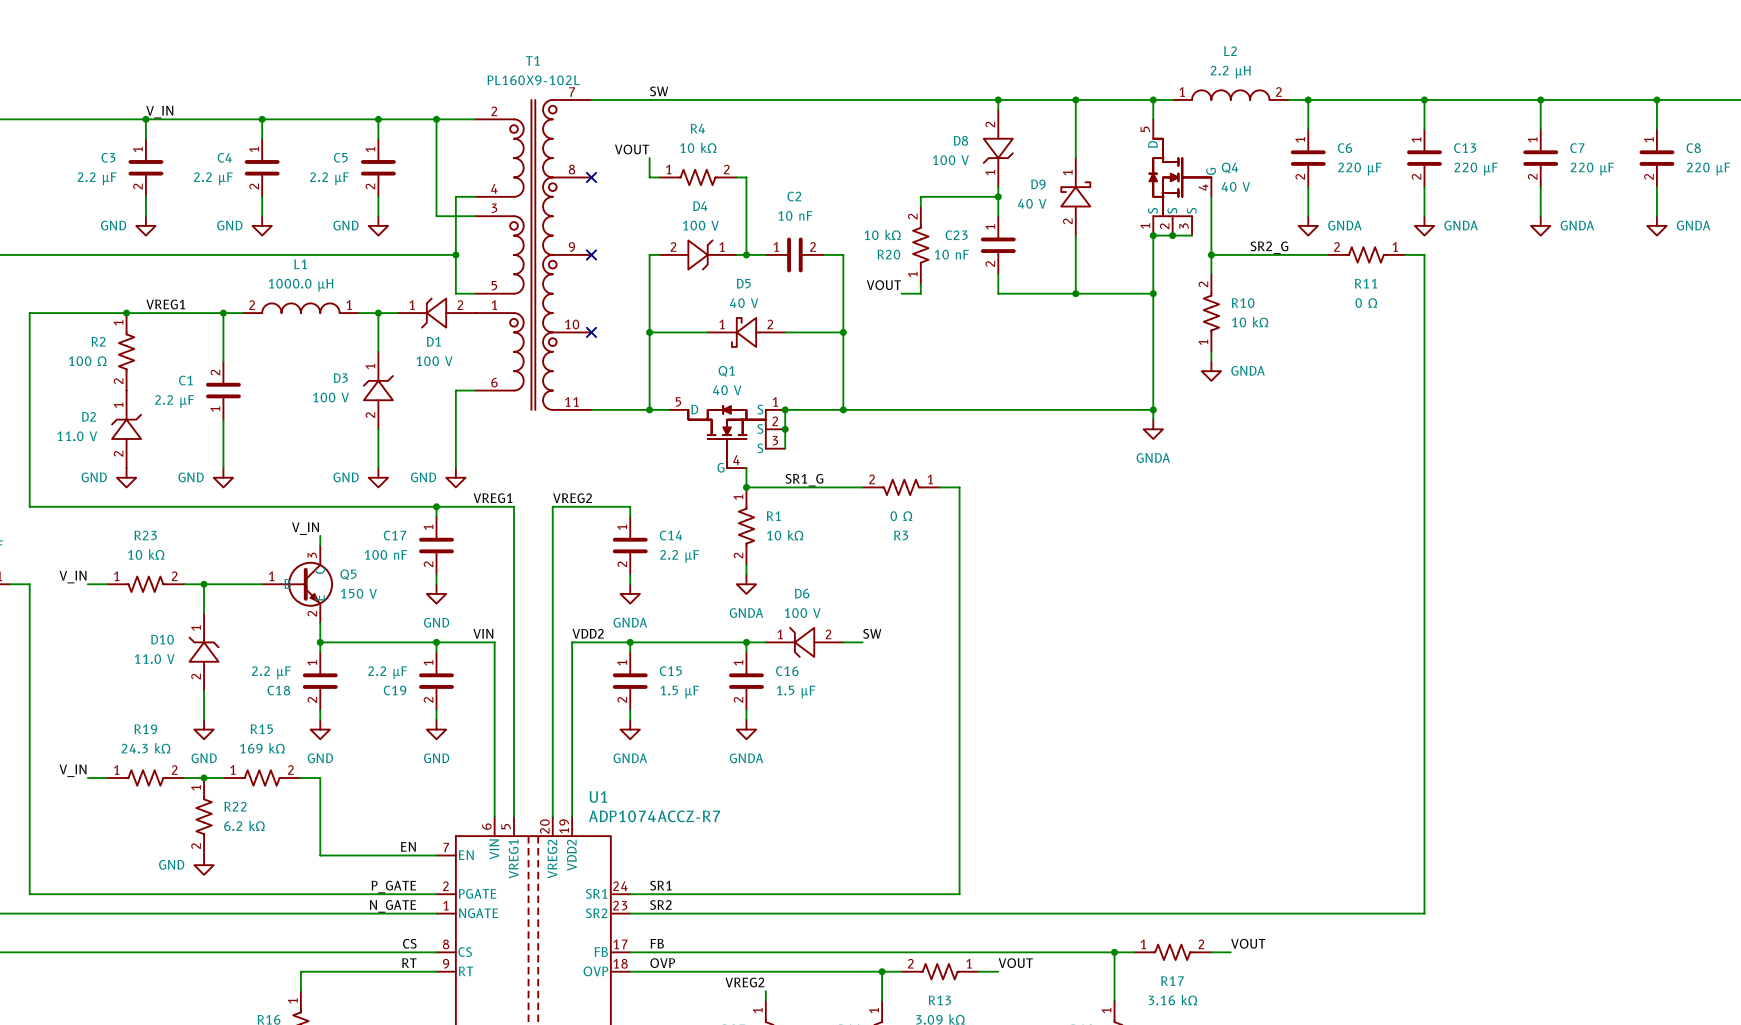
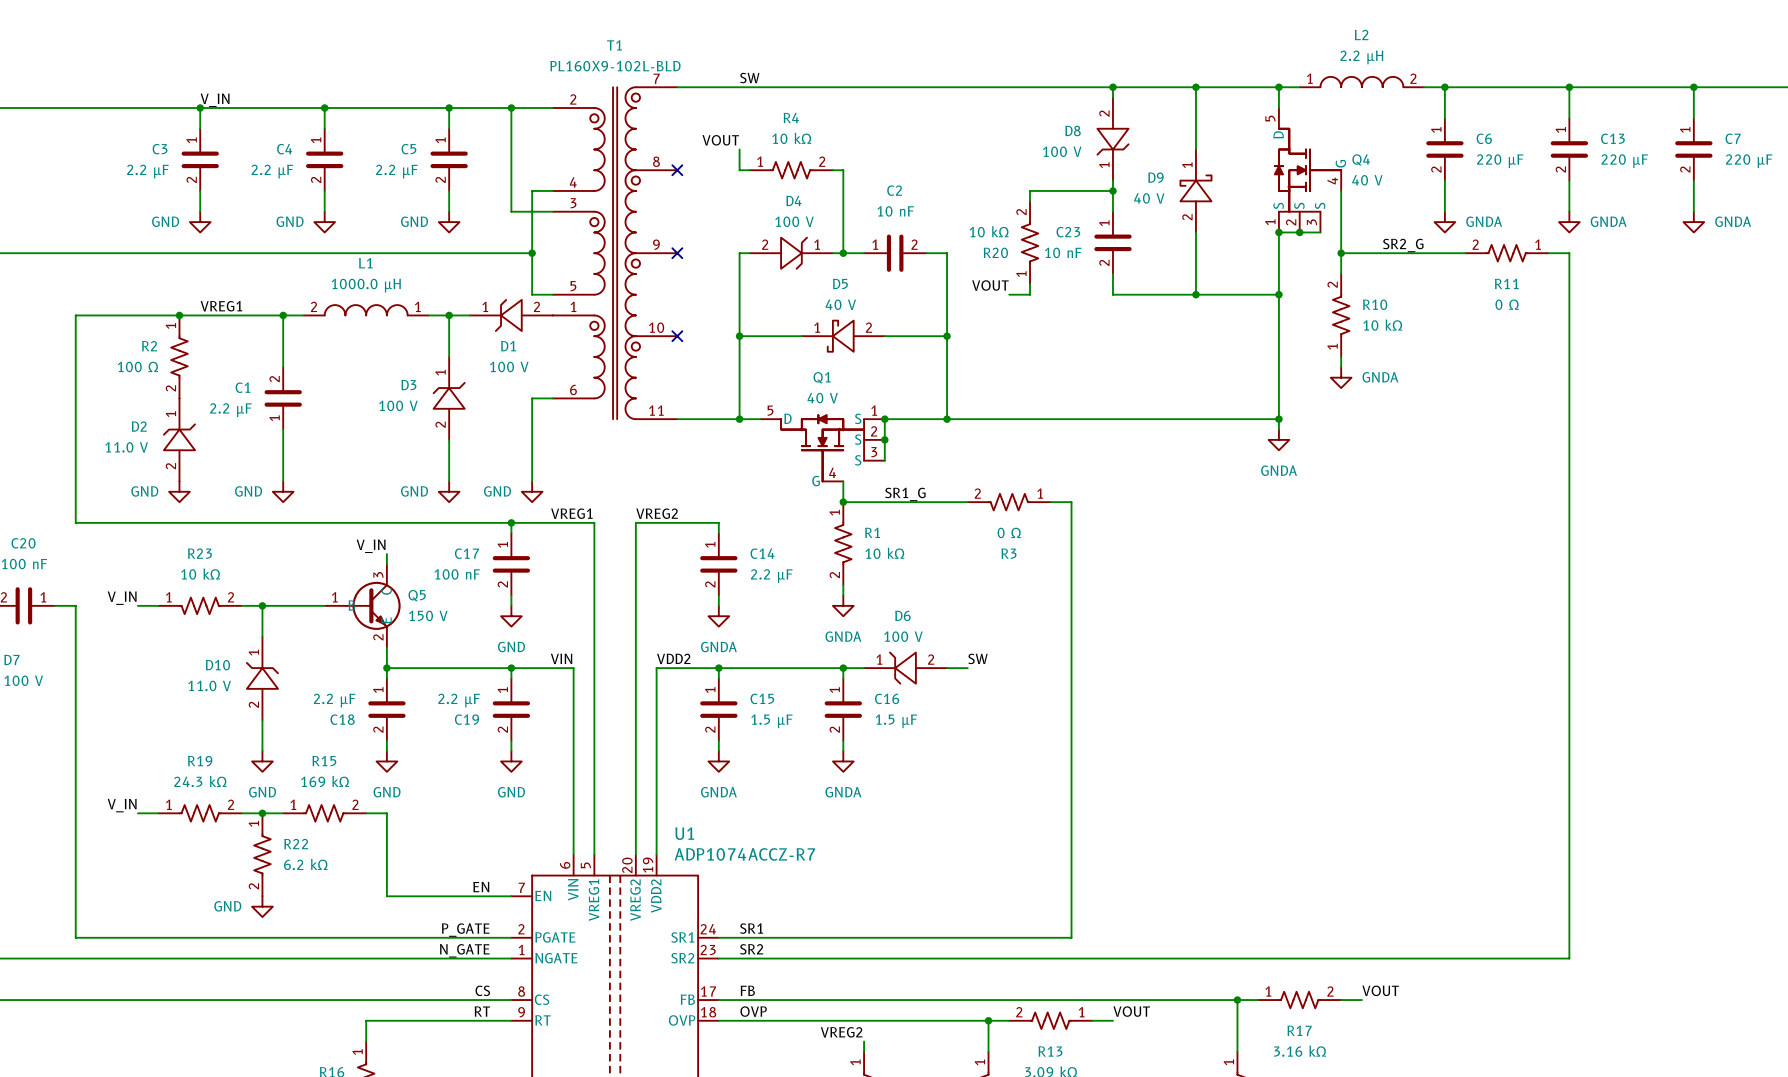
T1 value: PL160X9-102L (533, 80) -> PL160X9-102L-BLD (615, 66)

